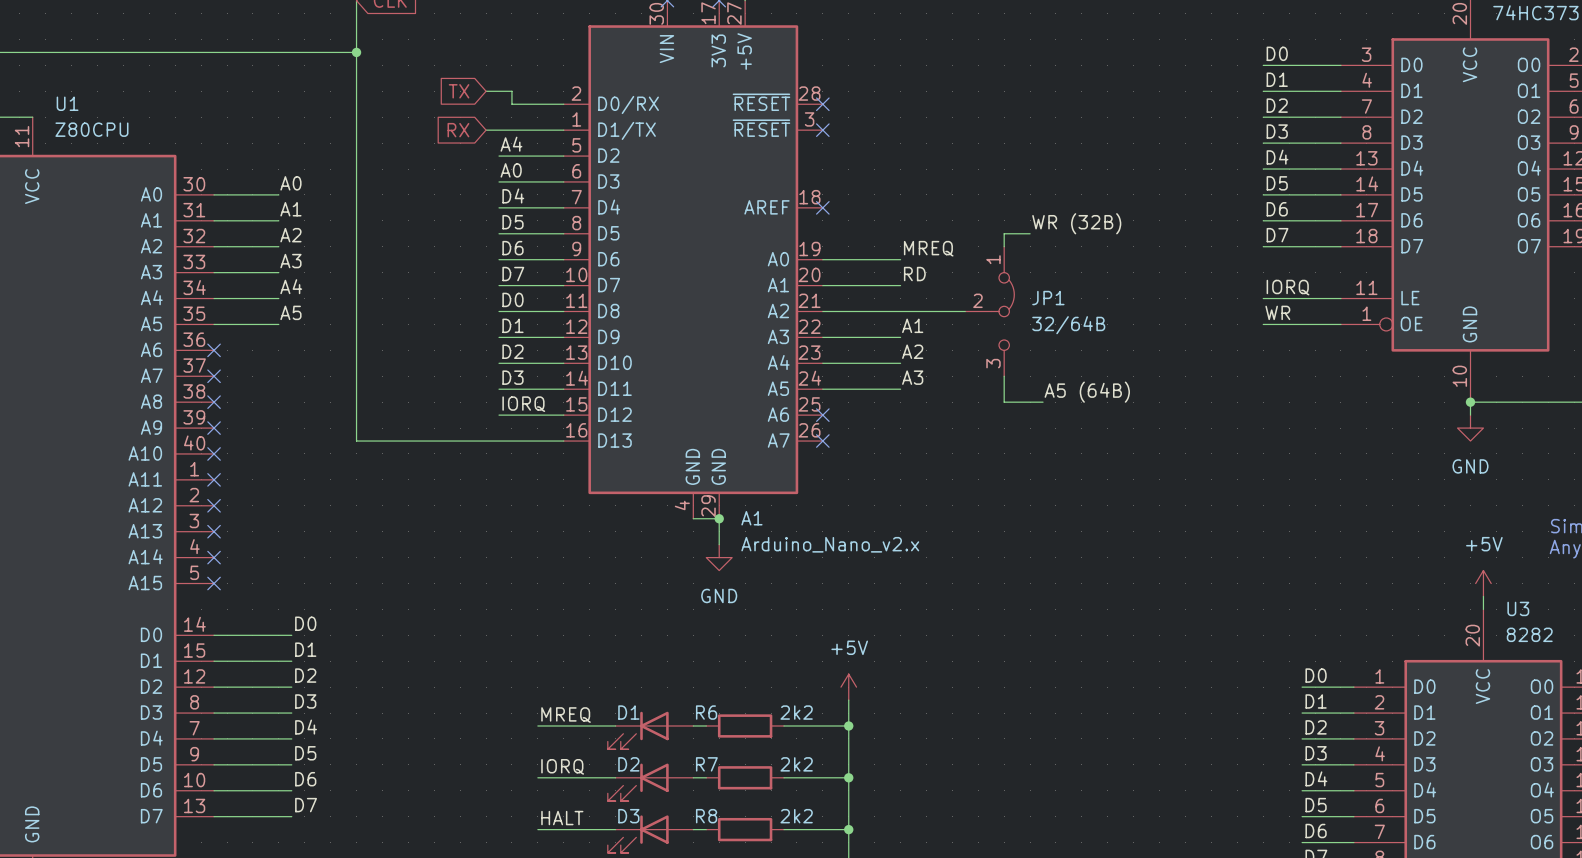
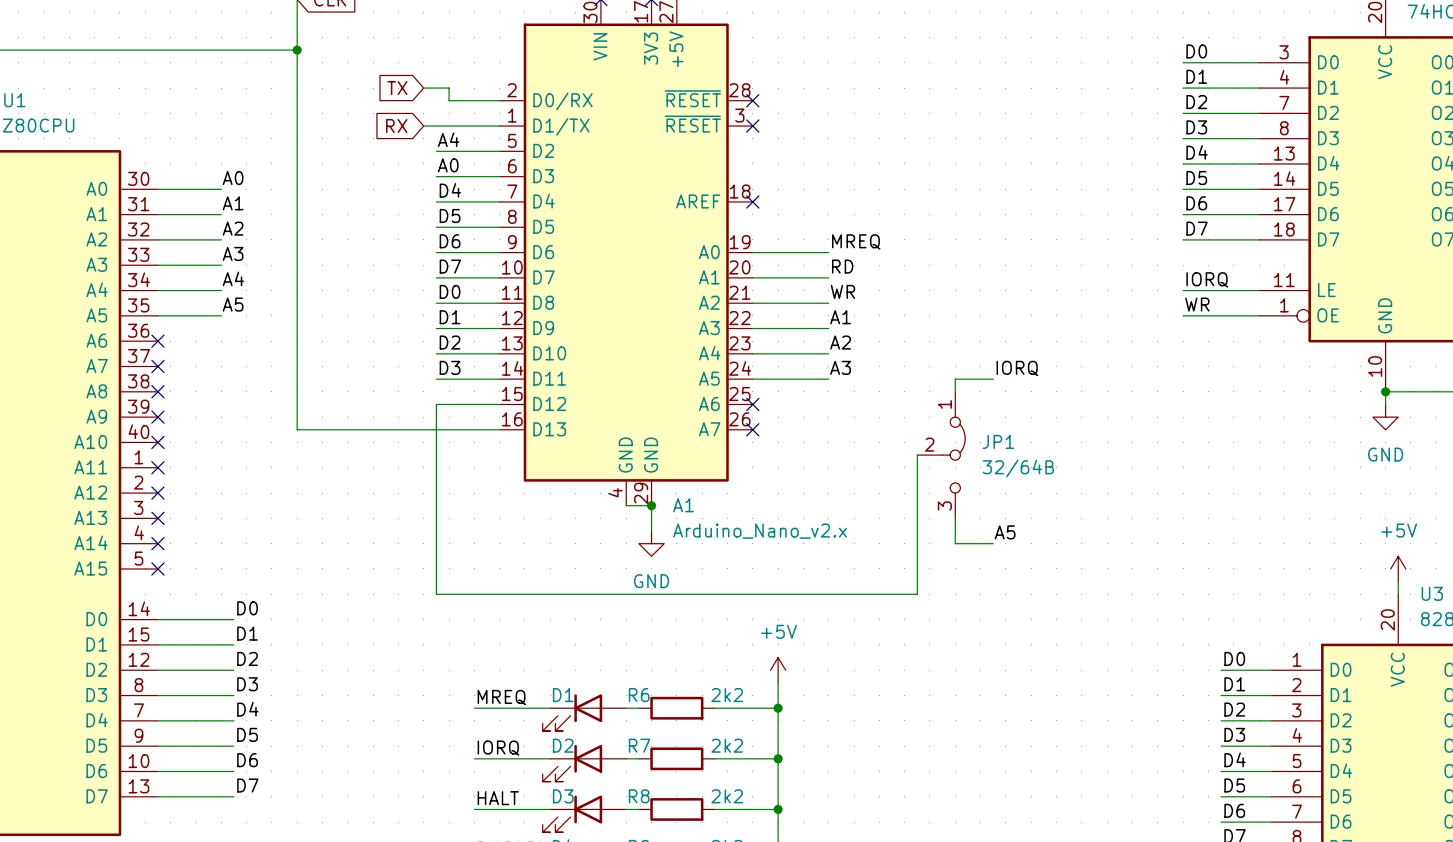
label: WR (32B) (1076, 223) -> none
wire: (1030, 233) (1004, 233) (1004, 246) -> none
label: none -> WR (842, 291)
wire: (900, 311) (965, 311) -> none
JP1 position: (989, 311) -> (941, 455)
wire: (1004, 376) (1004, 402) (1043, 402) -> (955, 518) (955, 543) (993, 543)
label: none -> IORQ (1017, 368)
wire: none -> (993, 379) (955, 379) (955, 391)
label: A5 (64B) (1087, 392) -> none
label: IORQ (523, 404) -> none
wire: none -> (436, 404) (436, 594) (917, 594) (917, 455)
label: none -> A5 (1005, 532)

